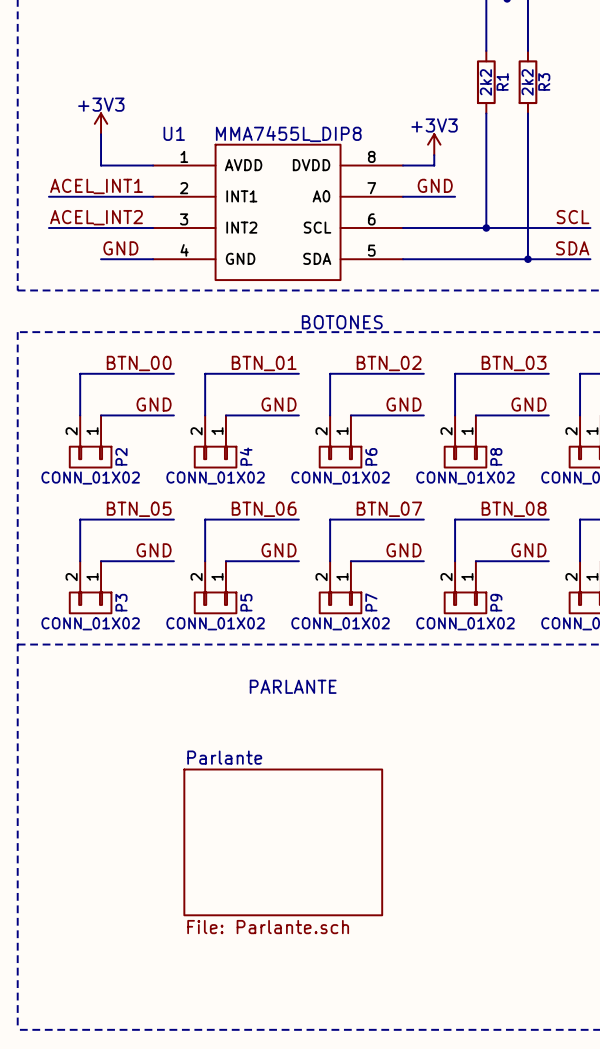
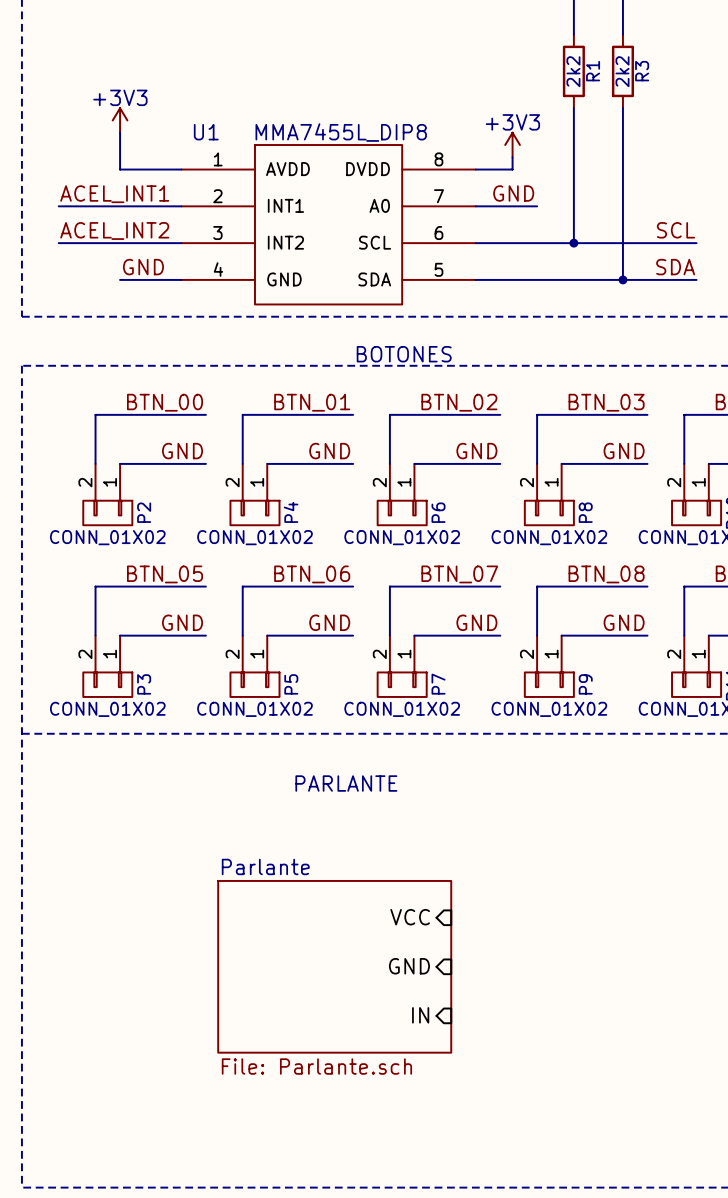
sheet pin: none -> VCC (410, 917)
sheet pin: none -> GND (409, 966)
sheet pin: none -> IN (420, 1015)

